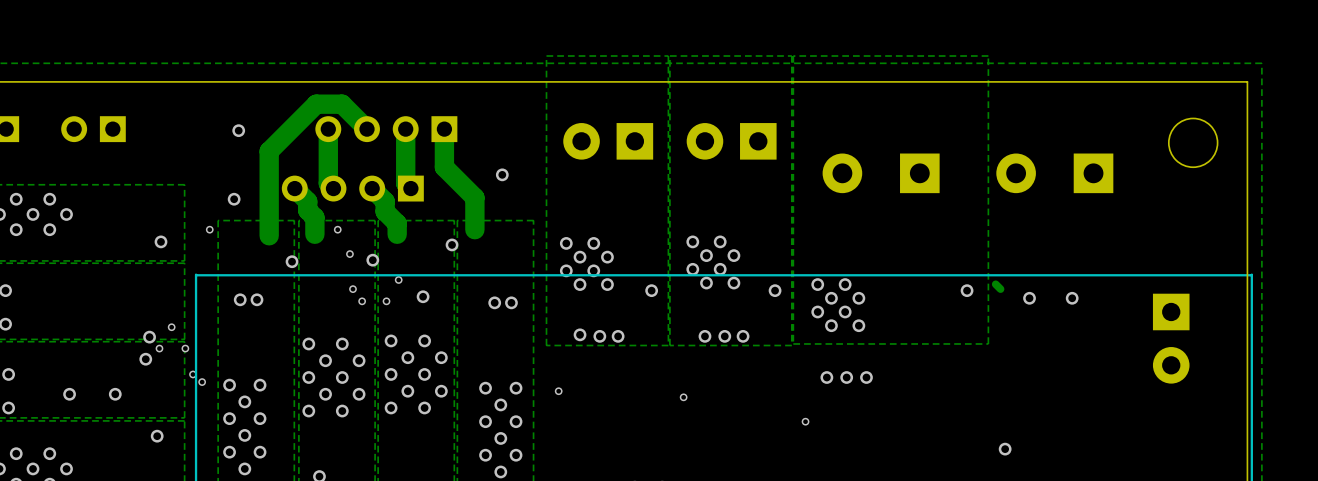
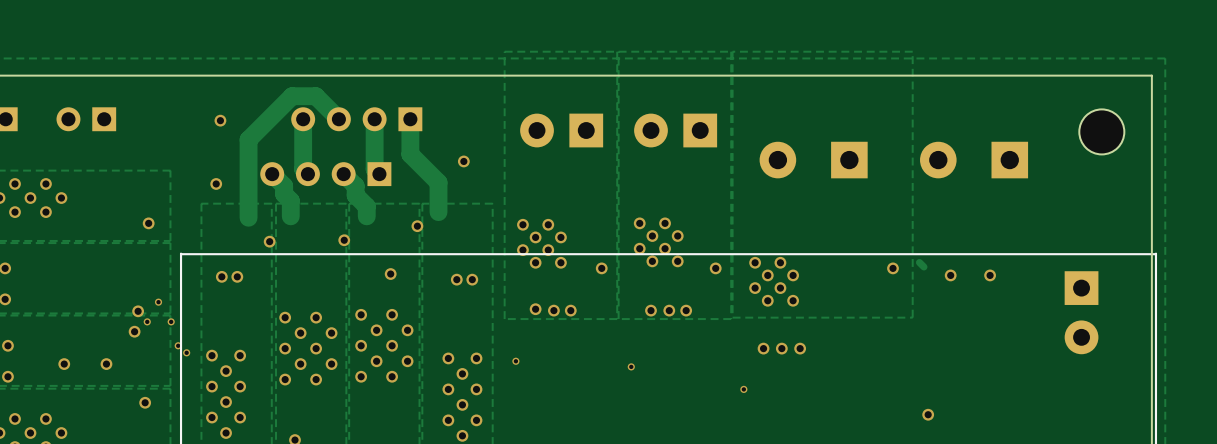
via: (209, 229) -> none
via: (337, 229) -> none
via: (349, 254) -> none
via: (398, 279) -> none
via: (352, 289) -> none
via: (362, 301) -> none
via: (386, 301) -> none

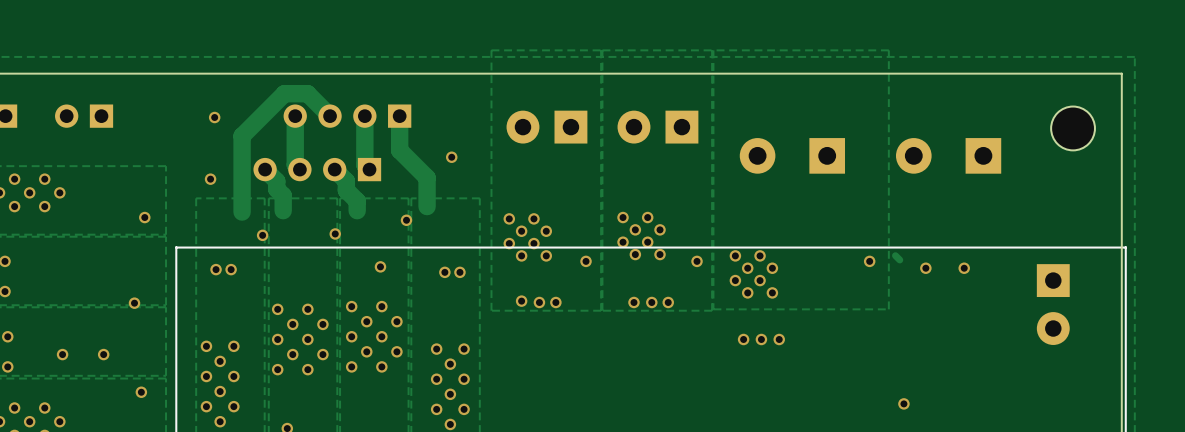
via: (158, 302) -> none
via: (147, 321) -> none
via: (171, 321) -> none
via: (134, 331) -> none
via: (178, 345) -> none
via: (186, 352) -> none
via: (515, 361) -> none
via: (631, 366) -> none
via: (743, 389) -> none

